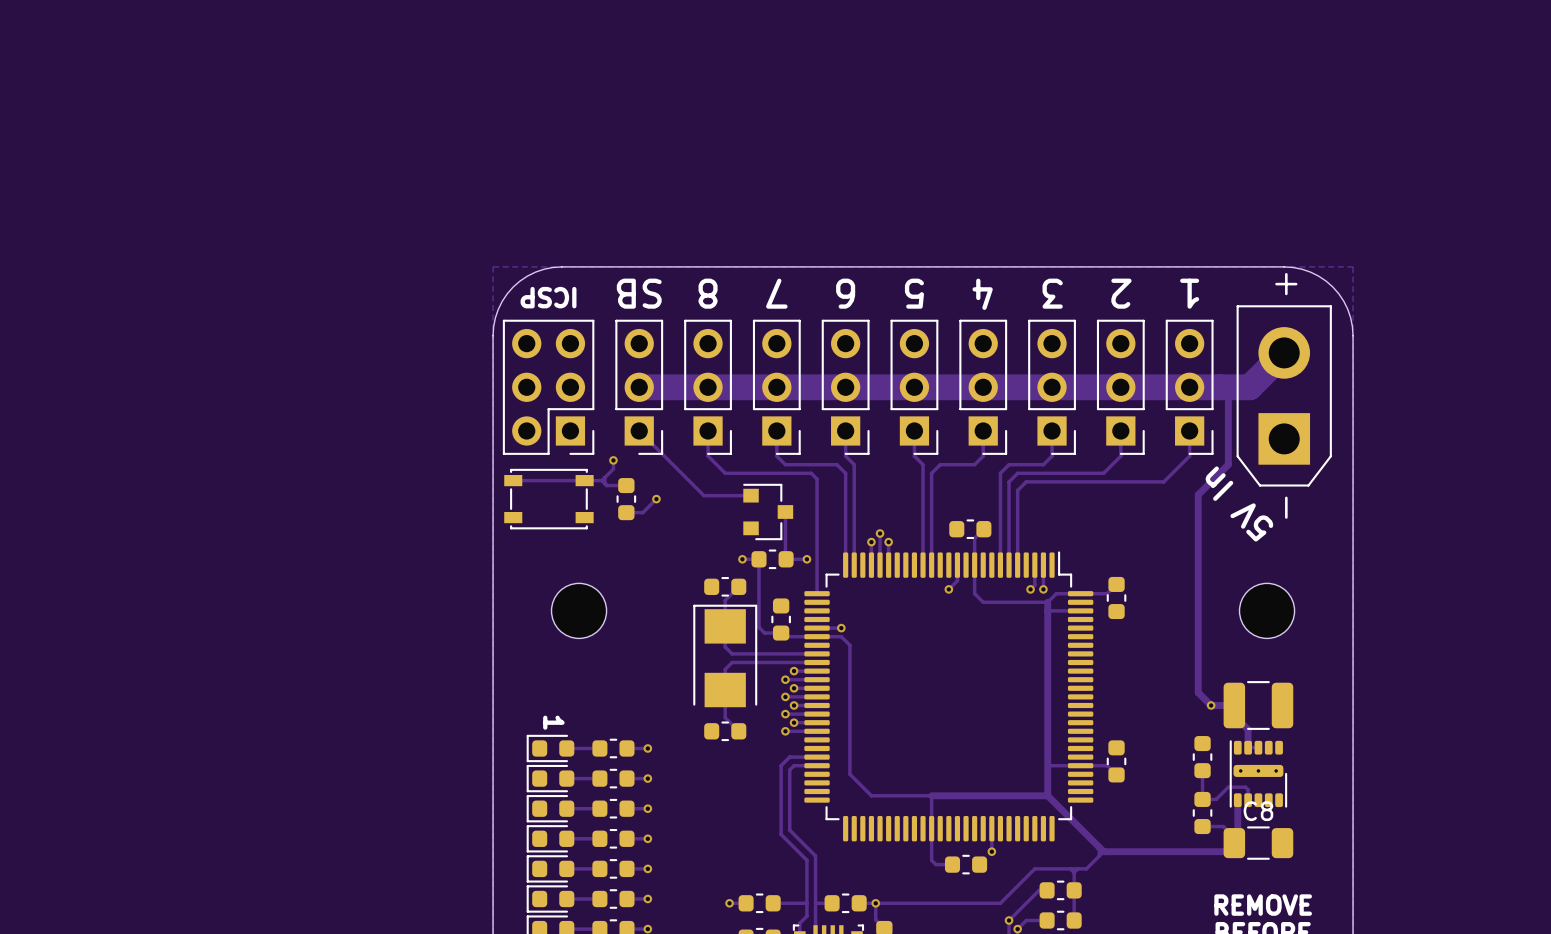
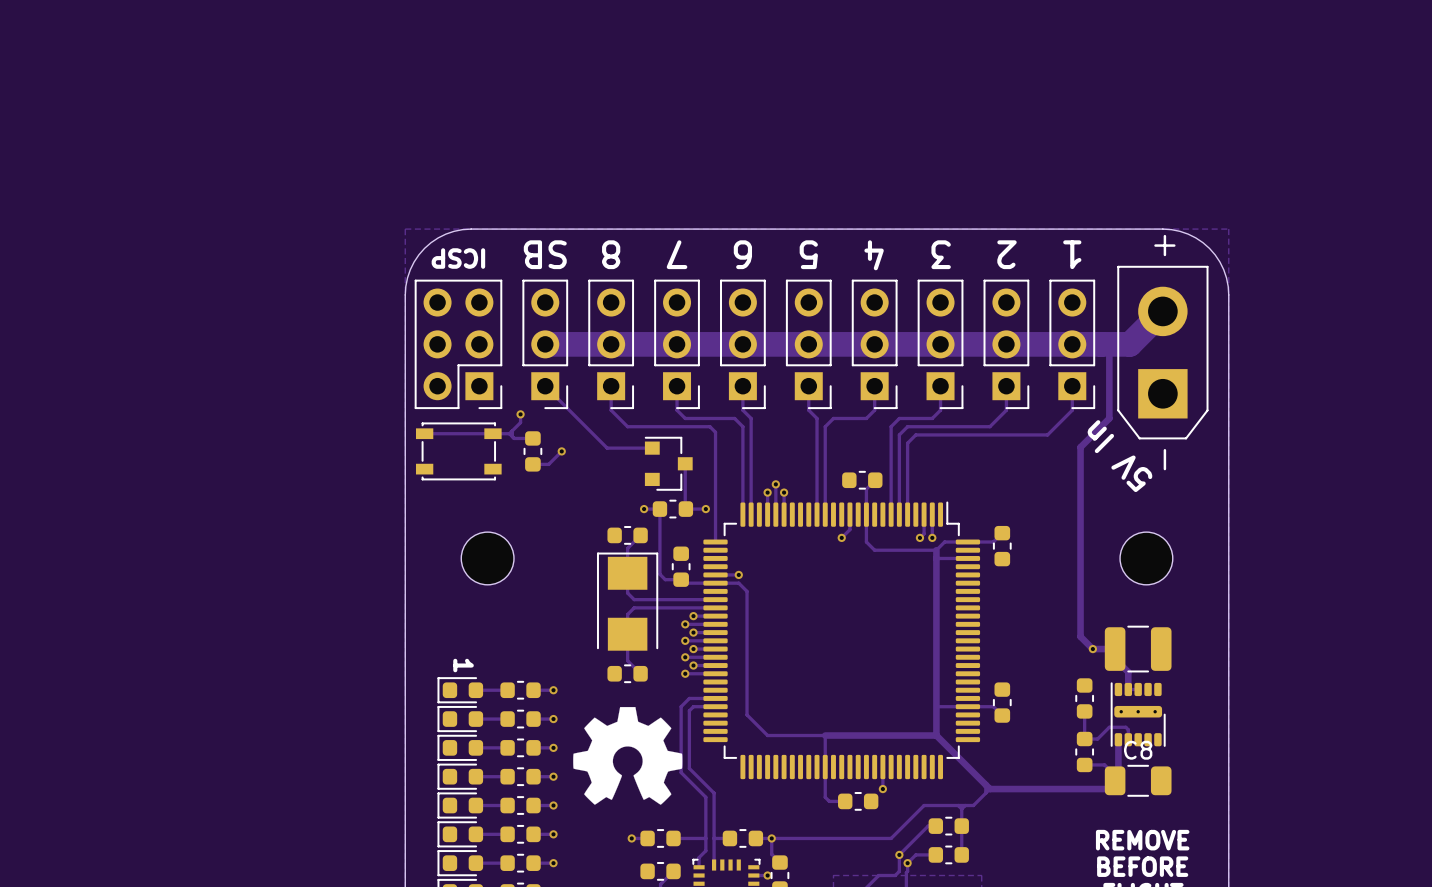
drawing: none -> [573, 707, 683, 805]

